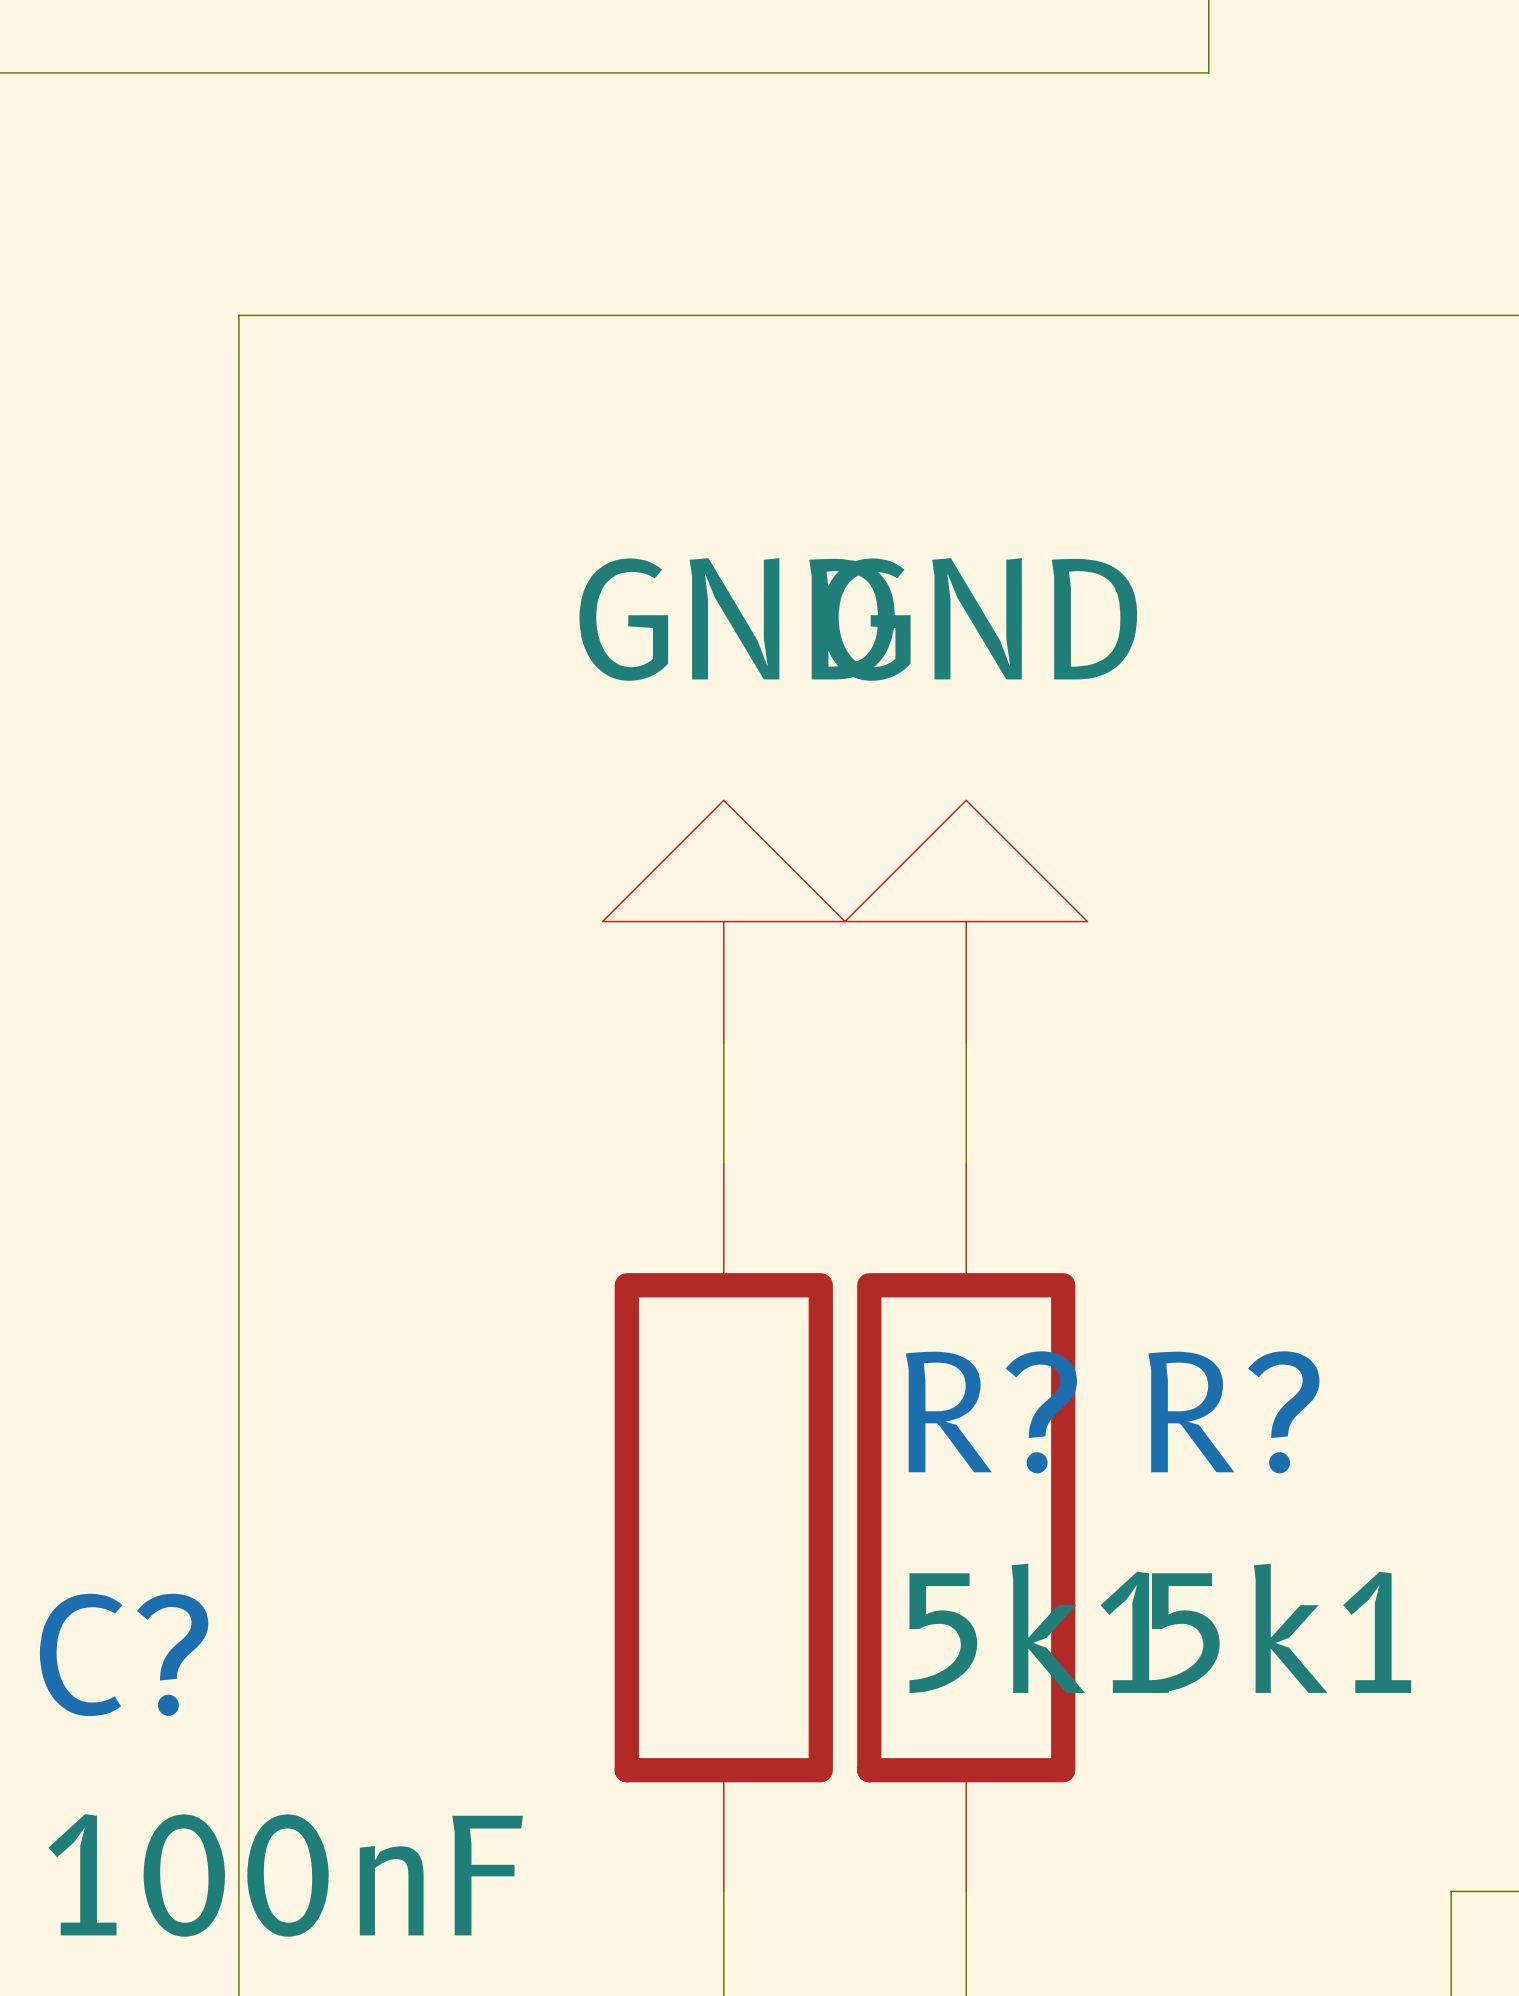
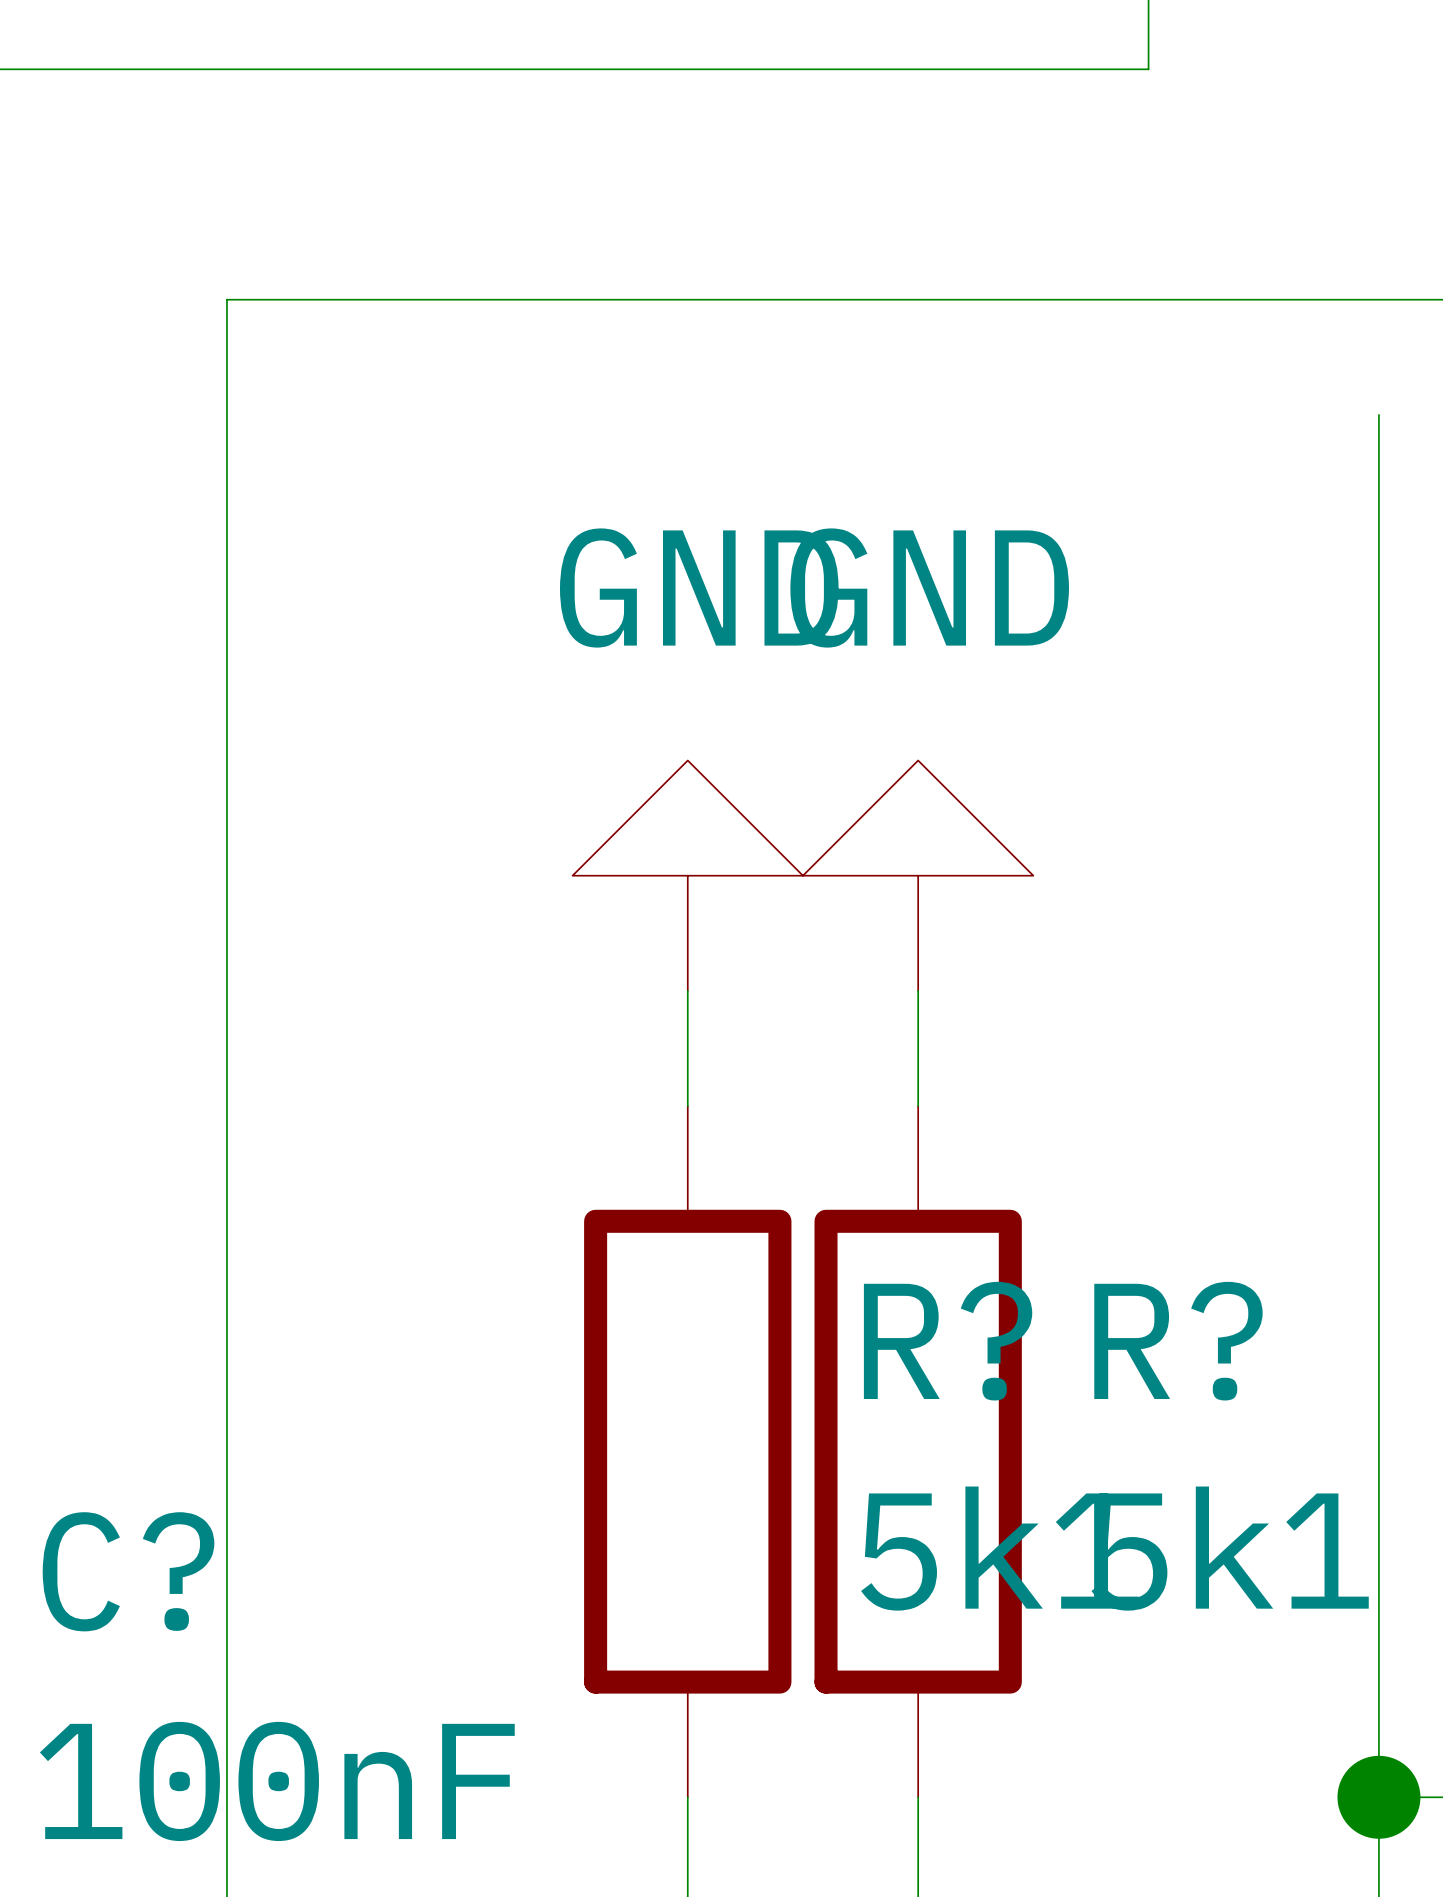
wire: none -> (1378, 414) (1378, 1797)
junction: none -> (1378, 1797)

